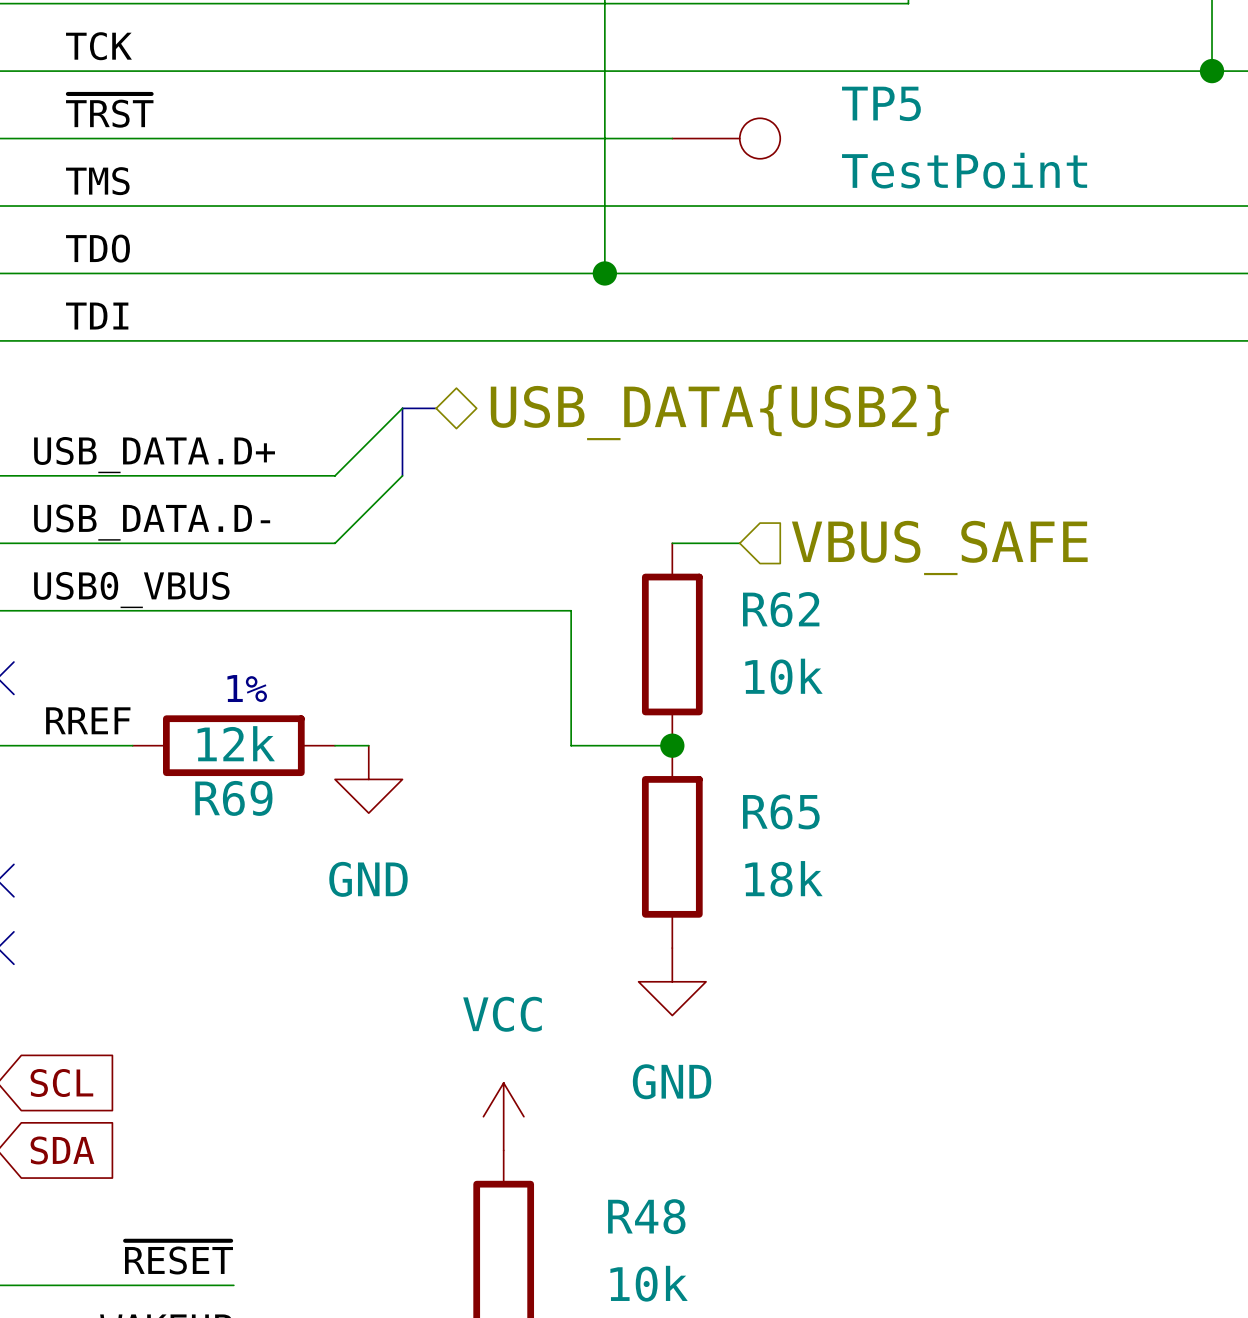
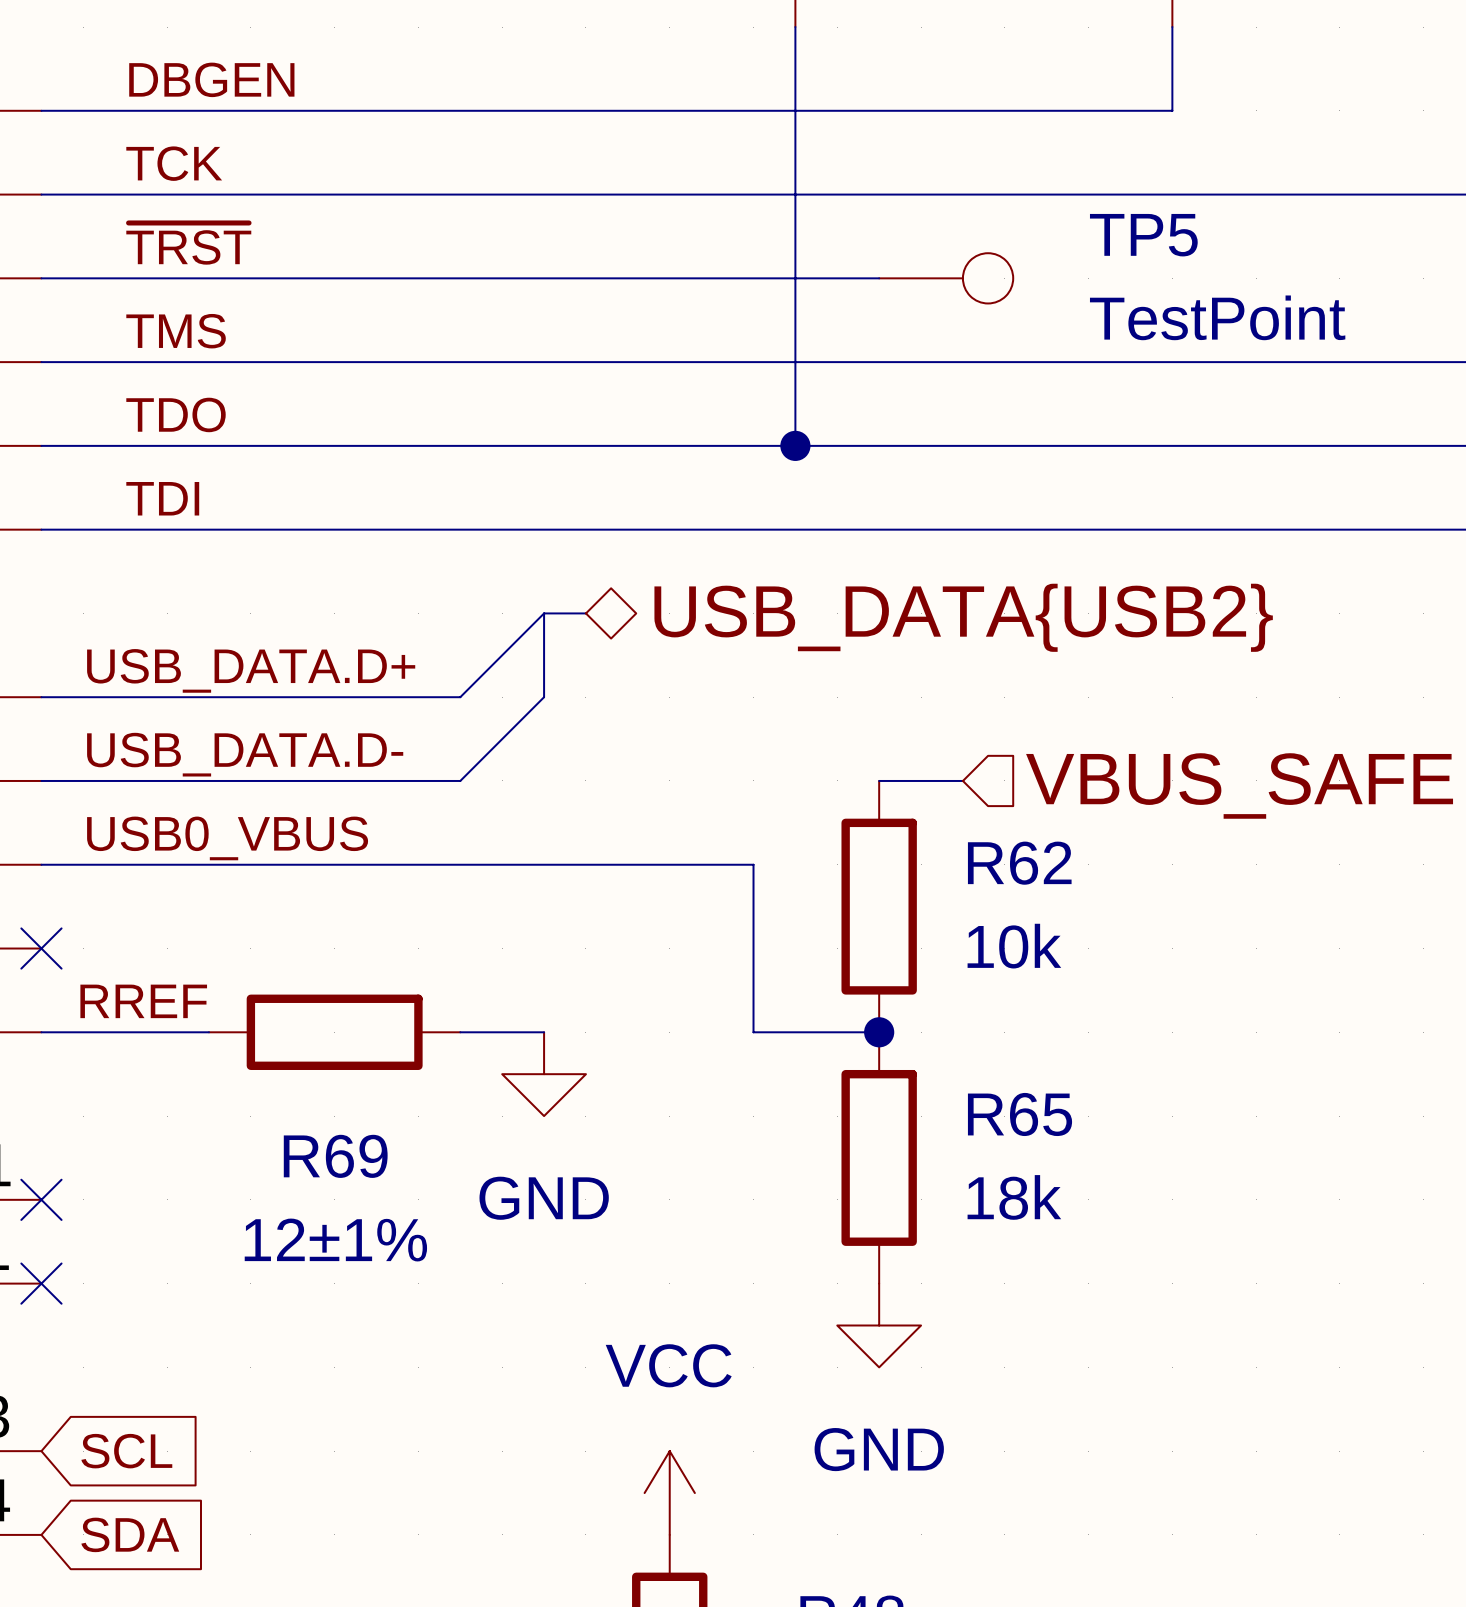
text: 1% (247, 688) -> none
R69 value: 12k (236, 743) -> 12±1% (335, 1240)
wire: none -> (502, 1032) (544, 1032)
power symbol position: GND (368, 779) -> GND (544, 1074)
R69 name position: R69 (233, 798) -> R69 (335, 1156)

